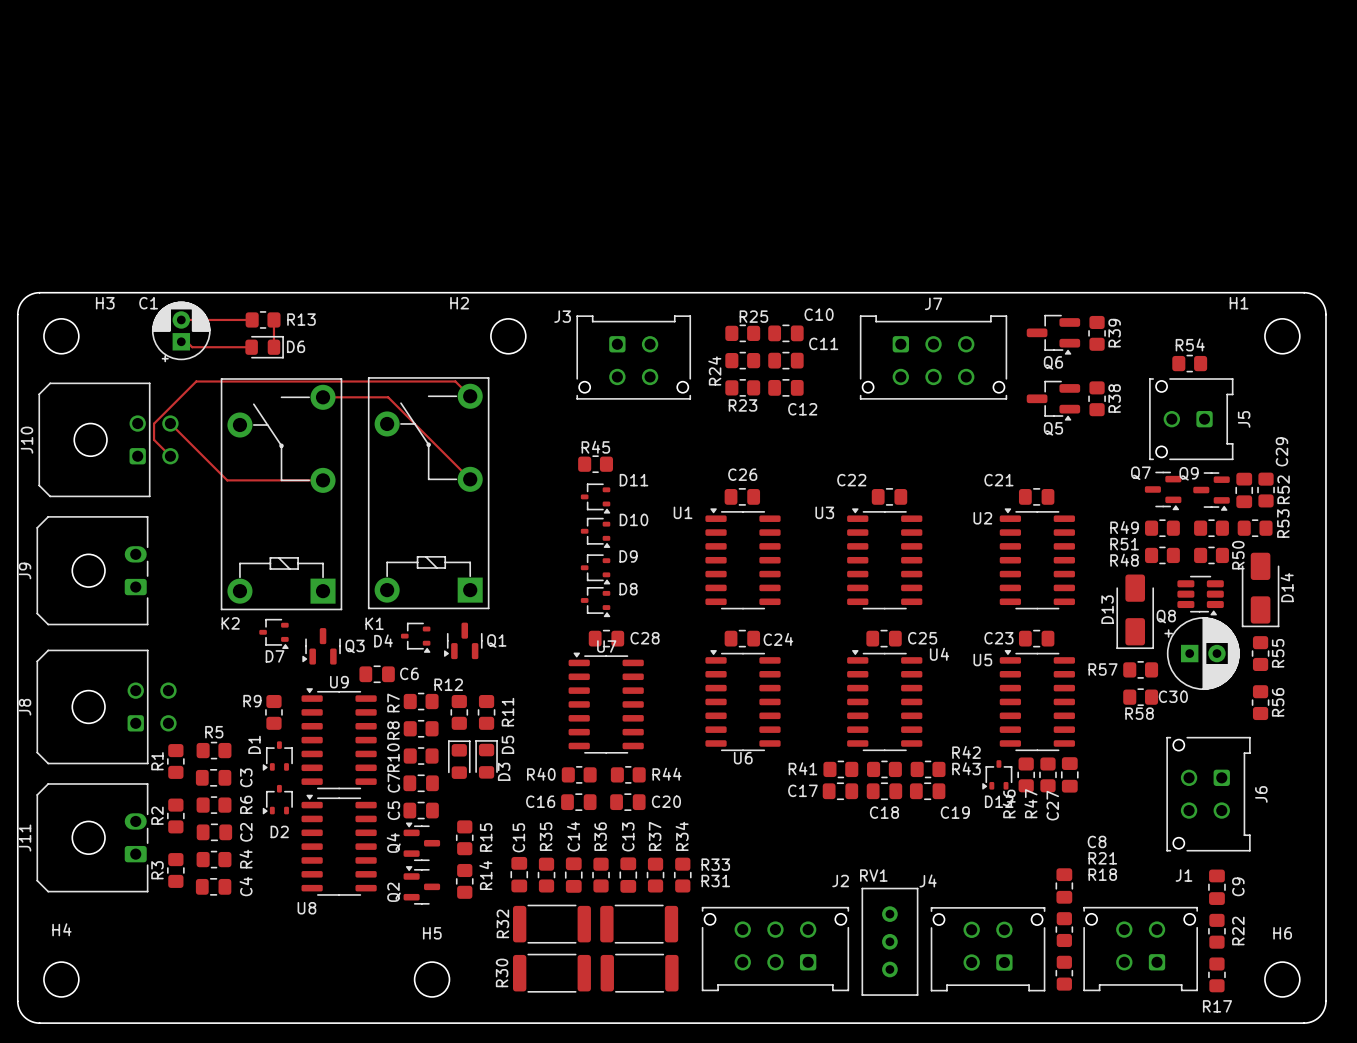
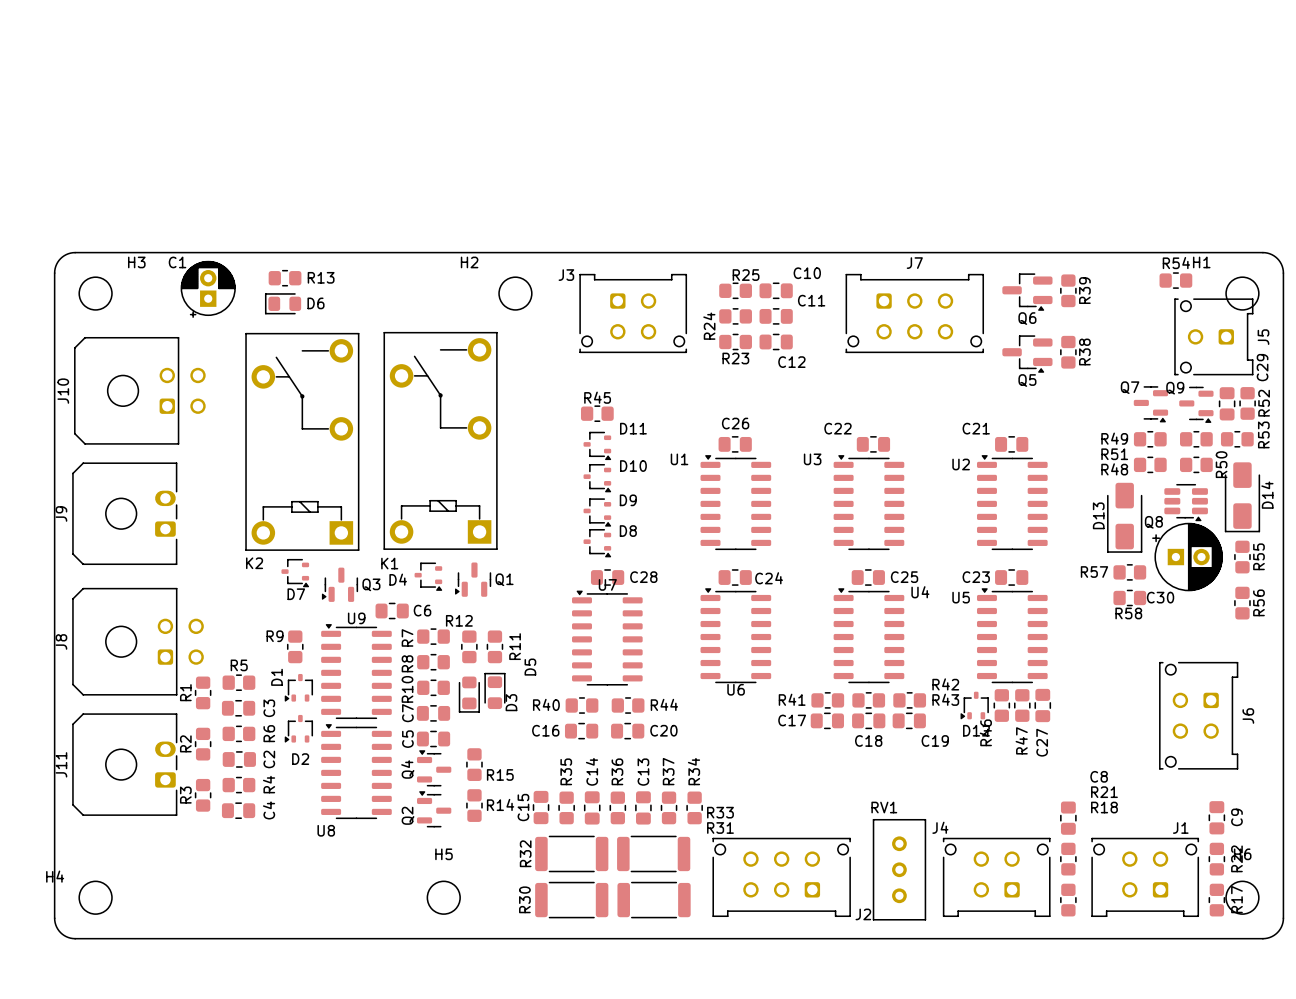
track: (181, 319) (252, 319) -> none
track: (273, 319) (273, 347) -> none
track: (181, 341) (186, 341) (192, 347) (251, 347) -> none
D6 rotation: 0° (264, 347) -> 180° (283, 303)
R54 position: (1189, 363) -> (1175, 280)
track: (470, 396) (455, 381) (196, 381) (154, 423) (154, 439) (170, 456) -> none
track: (323, 397) (388, 397) (470, 479) -> none
J5 position: (1191, 419) -> (1213, 336)
track: (170, 423) (227, 480) (323, 480) -> none
C29 position: (1244, 490) -> (1227, 403)
R52 position: (1266, 490) -> (1247, 403)
Q7 position: (1163, 491) -> (1150, 404)
Q9 position: (1211, 491) -> (1196, 404)
R49 position: (1162, 528) -> (1150, 439)
R51 position: (1211, 528) -> (1196, 439)
R53 position: (1255, 528) -> (1237, 439)
R48 position: (1162, 555) -> (1150, 464)
R50 position: (1211, 555) -> (1196, 464)
D14 position: (1260, 589) -> (1242, 497)
Q8 position: (1200, 595) -> (1186, 502)
D13 position: (1135, 611) -> (1124, 517)
C30 position: (1202, 653) -> (1187, 557)
R55 position: (1260, 653) -> (1242, 557)
R57 position: (1140, 669) -> (1129, 572)
R58 position: (1140, 697) -> (1129, 597)
R56 position: (1260, 702) -> (1242, 603)
D5 rotation: 0° (459, 759) -> 180° (469, 694)
J6 position: (1208, 794) -> (1198, 715)
R47 name position: R47 (1030, 803) -> R47 (1021, 740)
C27 name position: C27 (1052, 805) -> C27 (1042, 742)
R15 name rotation: 0° (486, 837) -> 90° clockwise (500, 774)
C15 name position: C15 (518, 837) -> C15 (523, 807)
R33 name position: R33 (715, 864) -> R33 (720, 812)
C15 position: (519, 874) -> (541, 807)
R14 name rotation: 0° (485, 875) -> 90° clockwise (500, 804)
R35 position: (546, 875) -> (566, 807)
C14 position: (573, 875) -> (592, 807)
R36 position: (601, 875) -> (617, 807)
C13 position: (628, 875) -> (643, 807)
R37 position: (655, 875) -> (669, 807)
R34 position: (682, 875) -> (694, 807)
J1 name position: J1 (1184, 875) -> J1 (1180, 828)
R31 name position: R31 (715, 880) -> R31 (720, 828)
J2 name position: J2 (840, 880) -> J2 (863, 914)
J4 name position: J4 (928, 880) -> J4 (940, 827)
C8 position: (1064, 885) -> (1068, 818)
C9 position: (1216, 887) -> (1216, 817)
R32 position: (551, 924) -> (571, 853)
R33 position: (639, 924) -> (653, 853)
H4 name position: H4 (61, 929) -> H4 (55, 876)
R21 position: (1064, 929) -> (1068, 859)
R22 position: (1216, 931) -> (1216, 859)
RV1 position: (889, 941) -> (899, 869)
J2 position: (775, 949) -> (781, 877)
J4 position: (988, 949) -> (996, 877)
J1 position: (1140, 949) -> (1145, 877)
R30 position: (551, 973) -> (571, 900)
R31 position: (639, 973) -> (654, 900)
R18 position: (1064, 973) -> (1068, 900)
R17 position: (1216, 974) -> (1216, 900)
R17 name rotation: 0° (1217, 1006) -> 90° counterclockwise (1236, 899)
R17 name position: R17 (1217, 1006) -> R17 (1236, 899)

